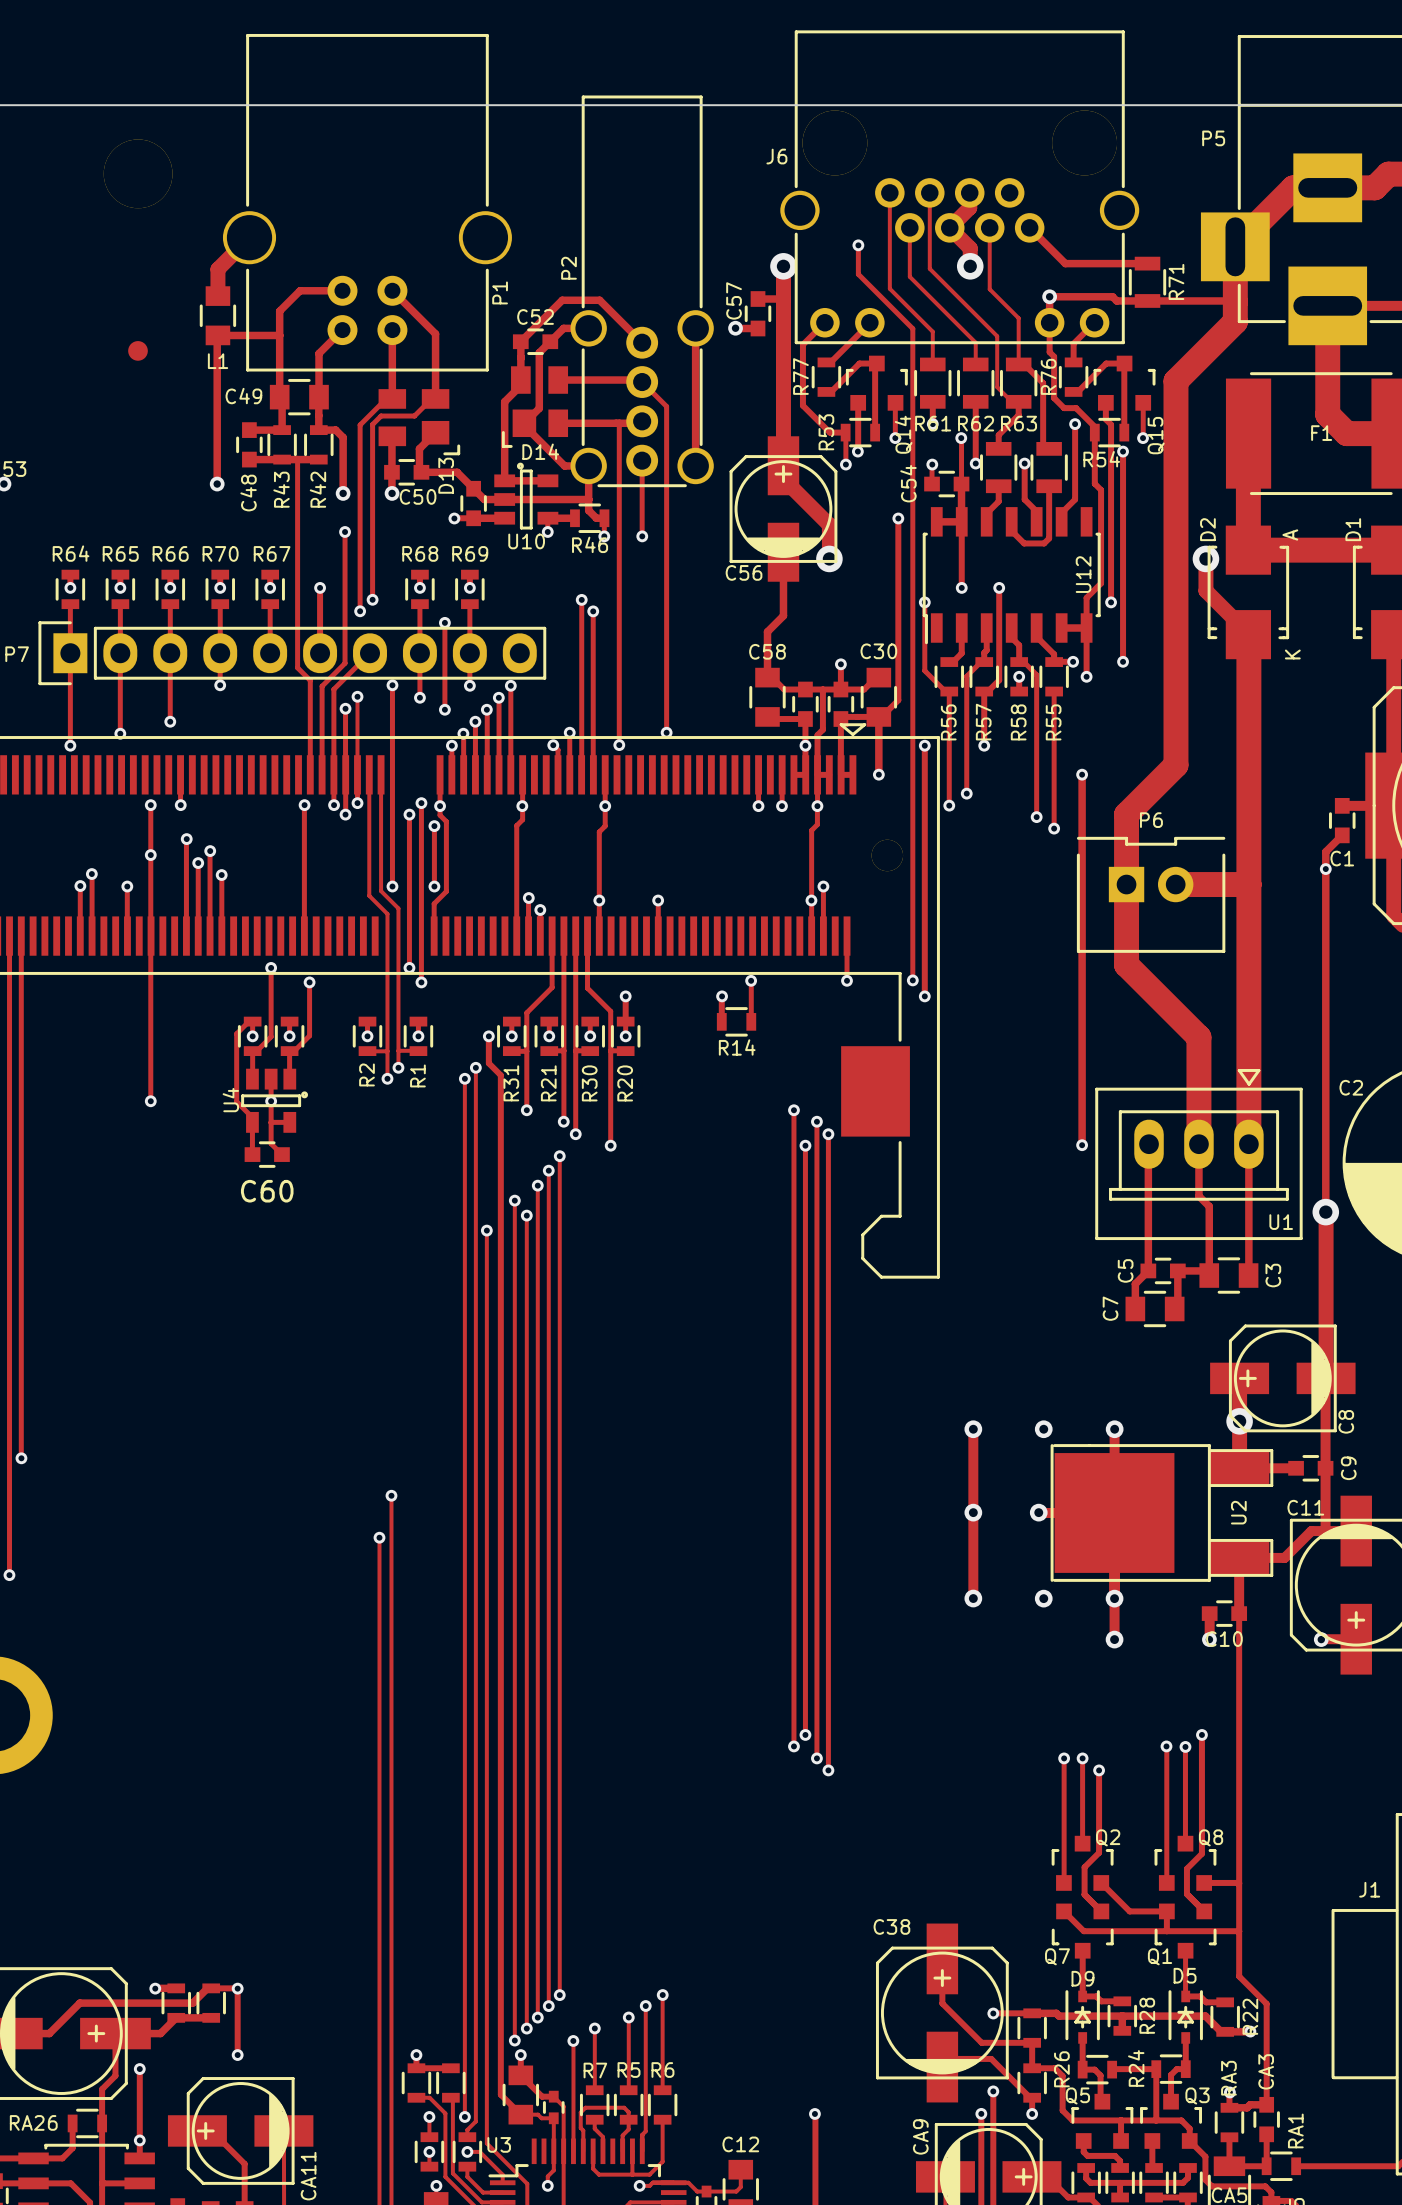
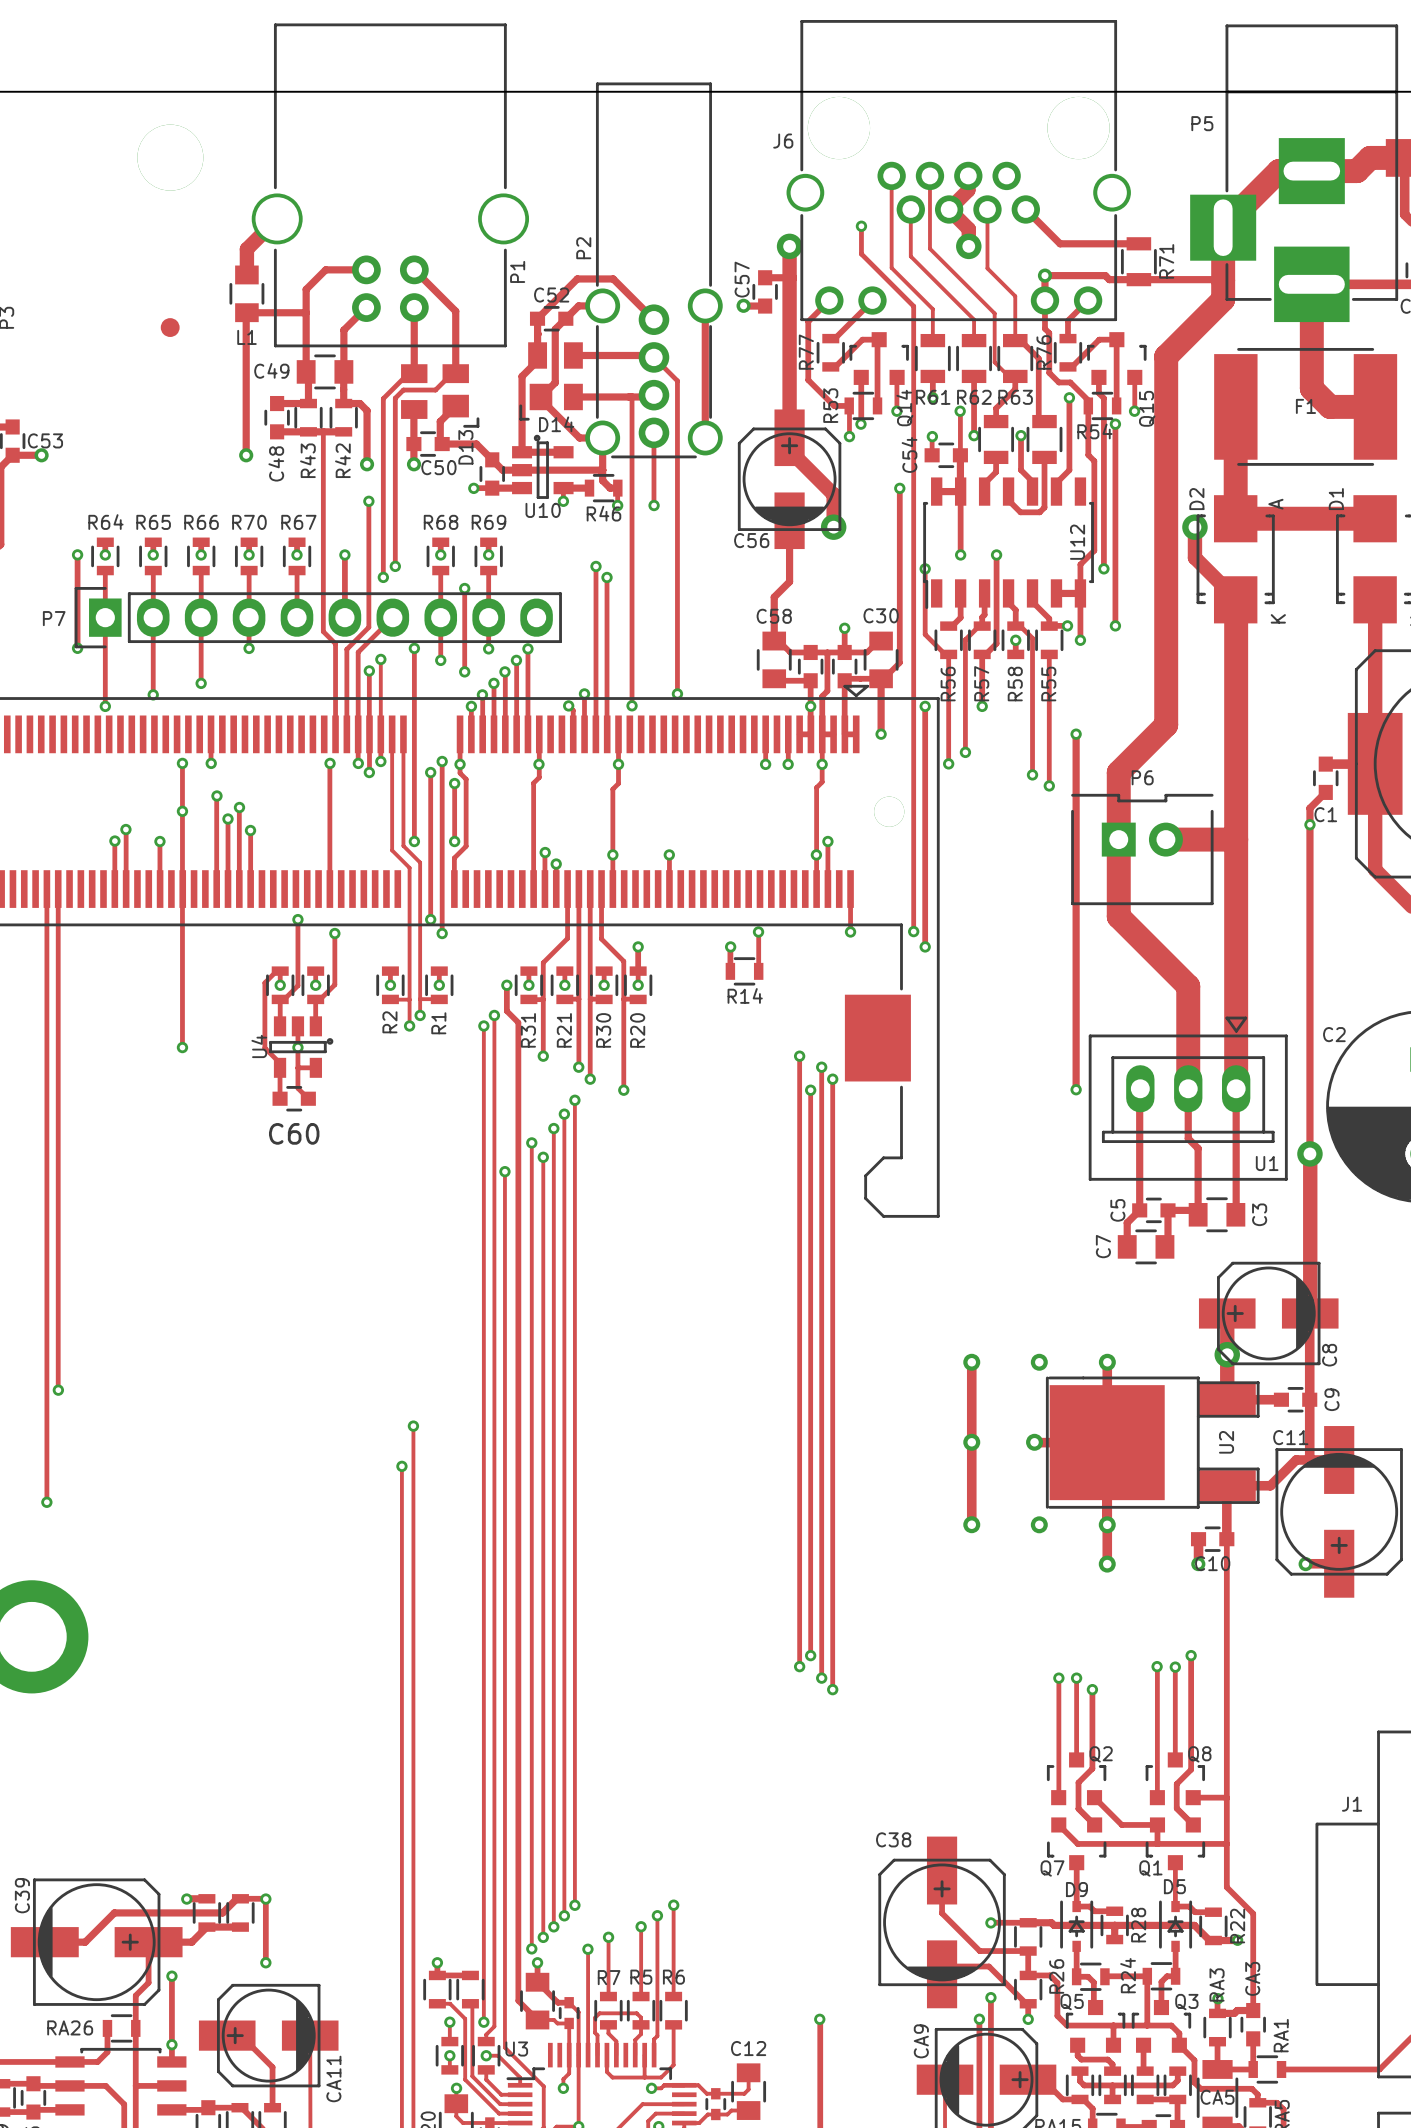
track: none -> (77, 554) (77, 648)
via: none -> (77, 554)
via: none -> (77, 648)

